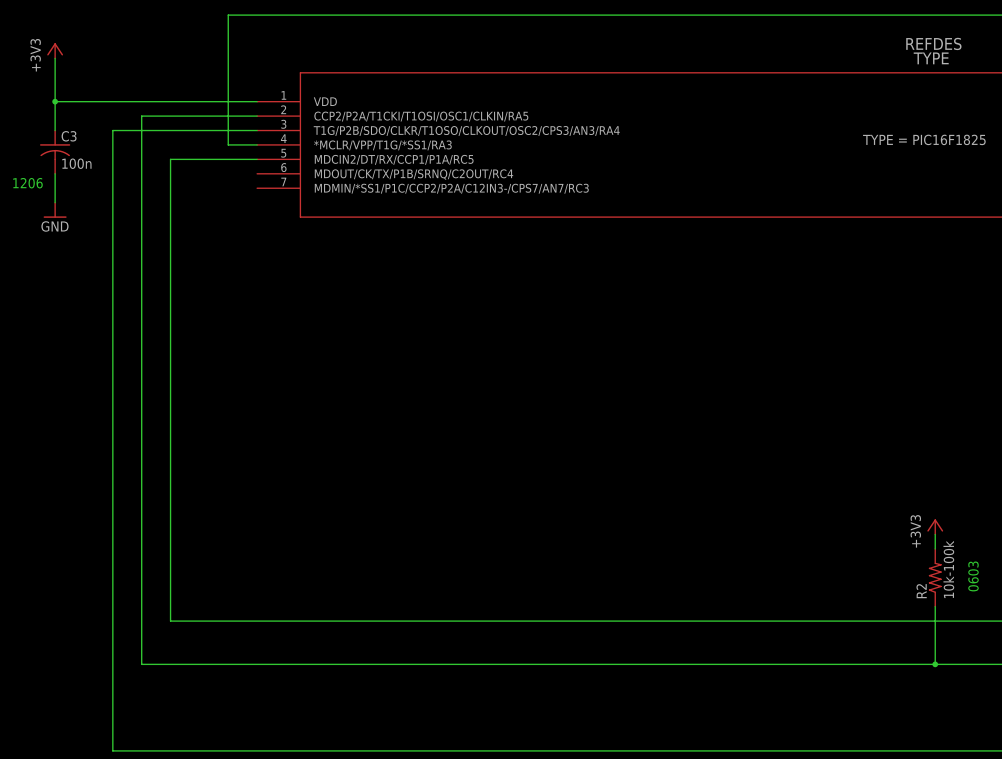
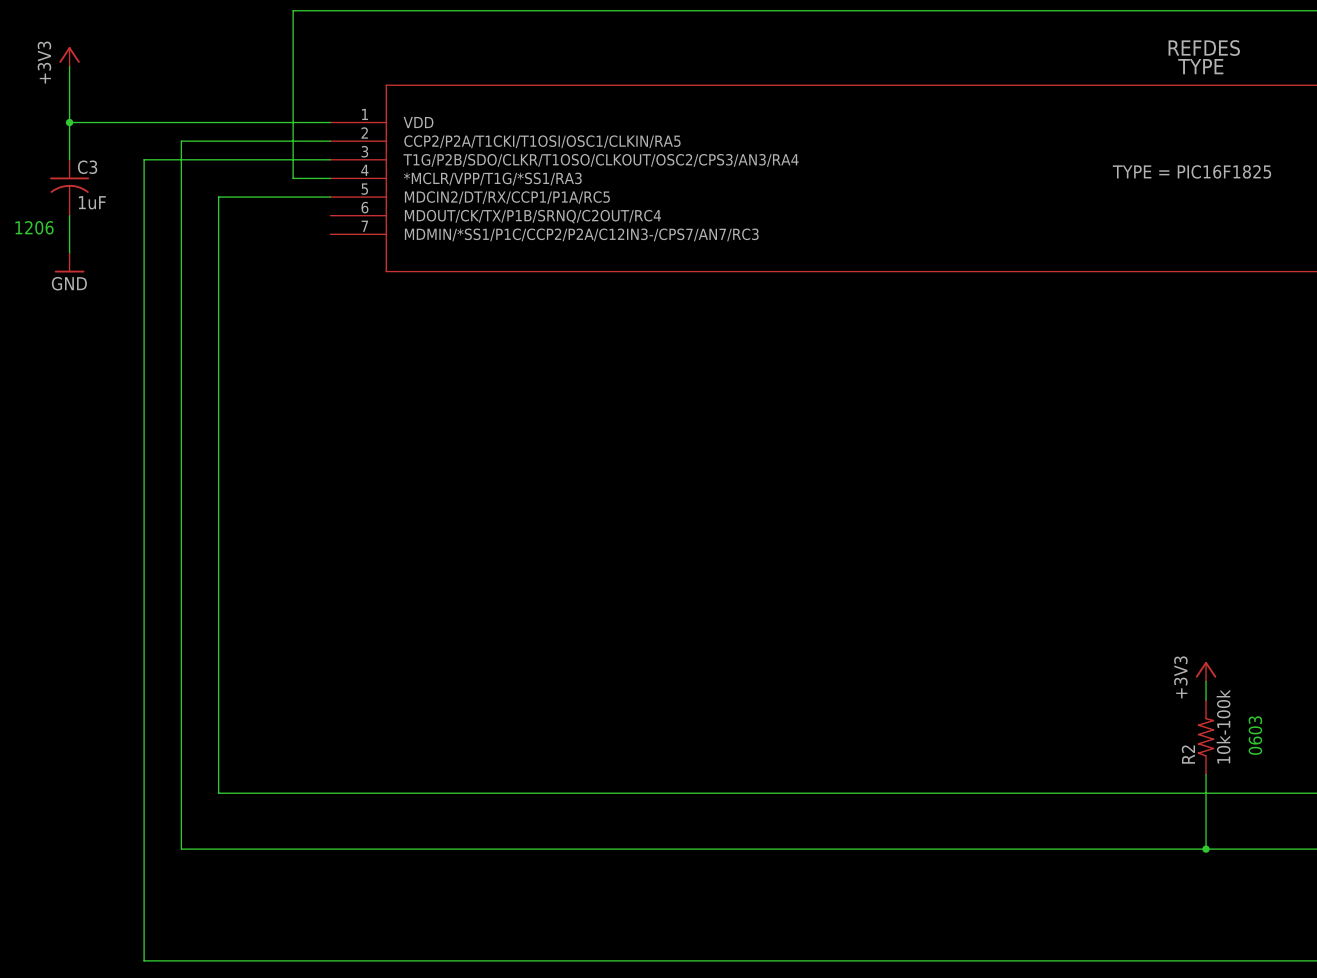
C3 value: 100n (76, 163) -> 1uF (92, 202)

